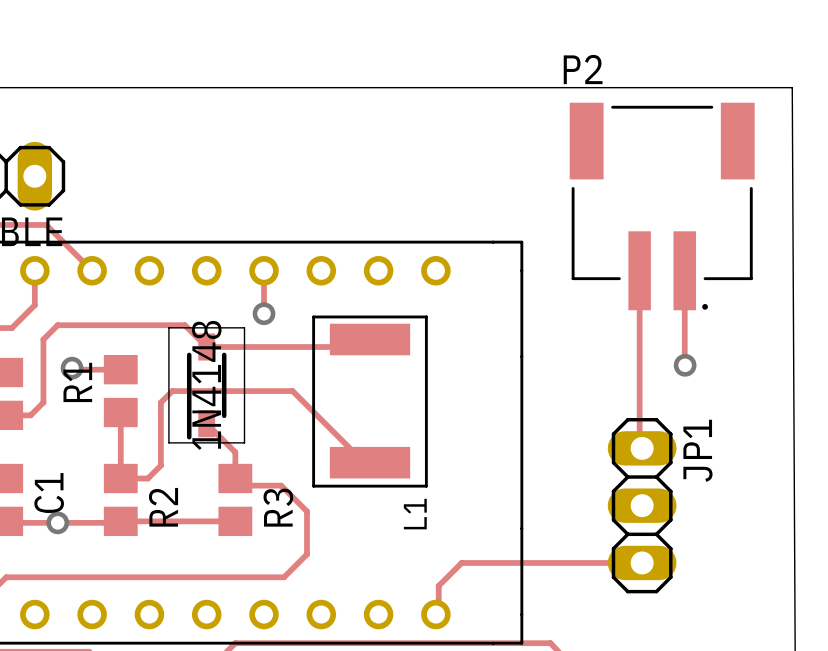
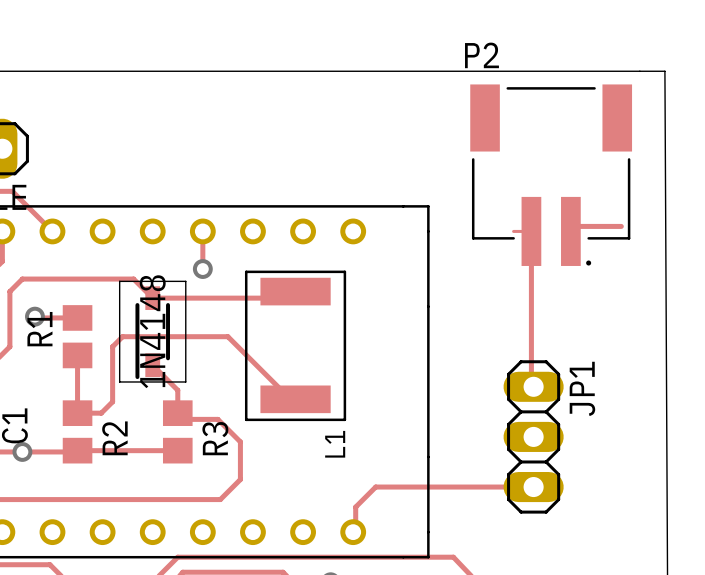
track: none -> (513, 231) (531, 231)
track: (684, 270) (684, 371) (685, 365) -> (570, 231) (575, 226) (621, 226)
via: (685, 365) -> none

